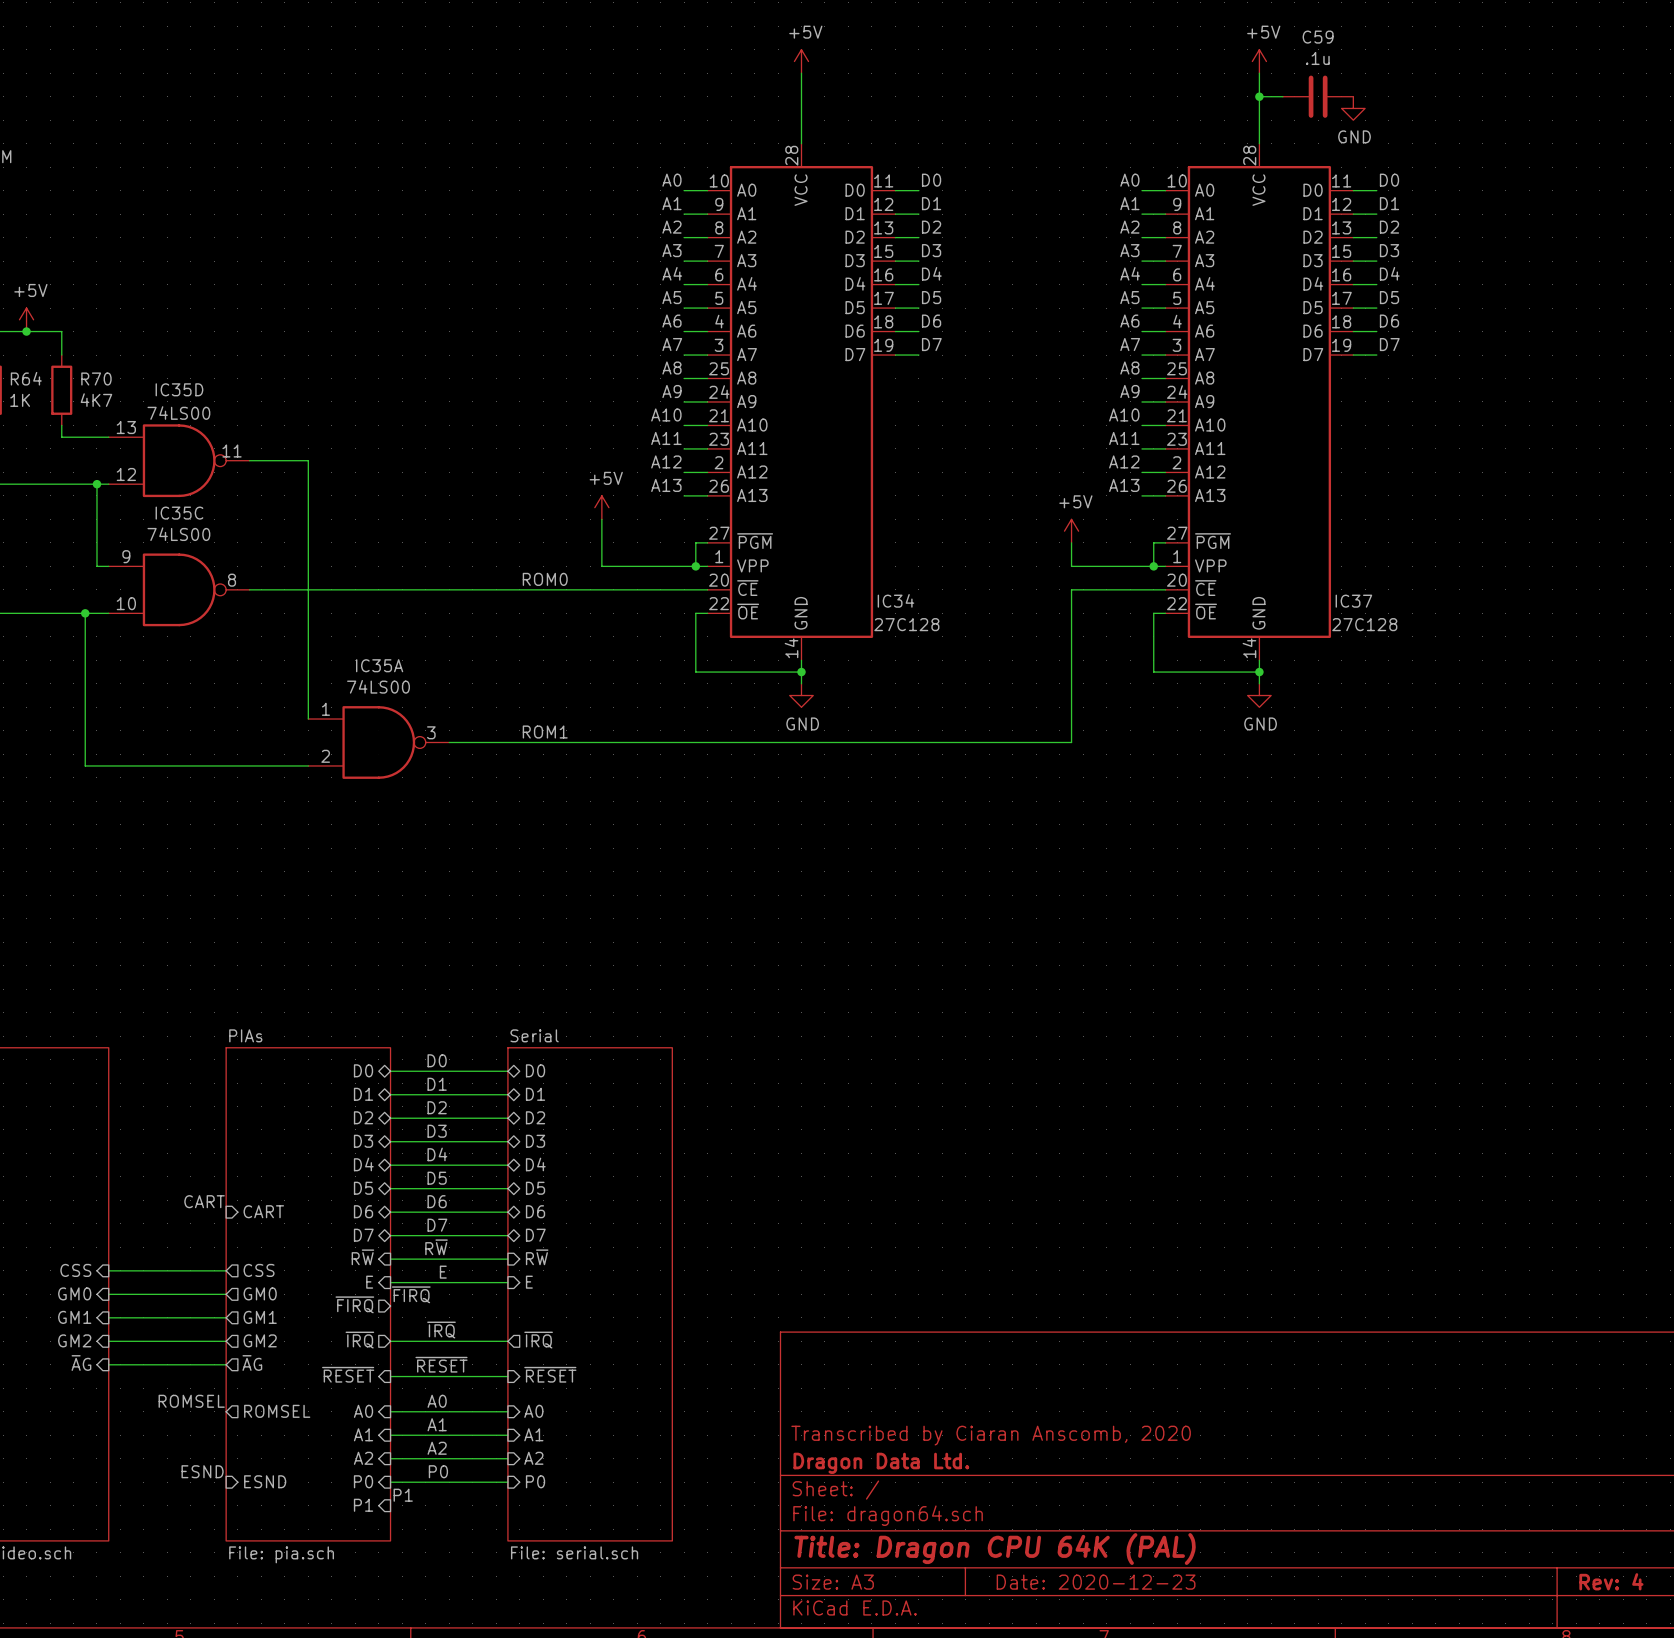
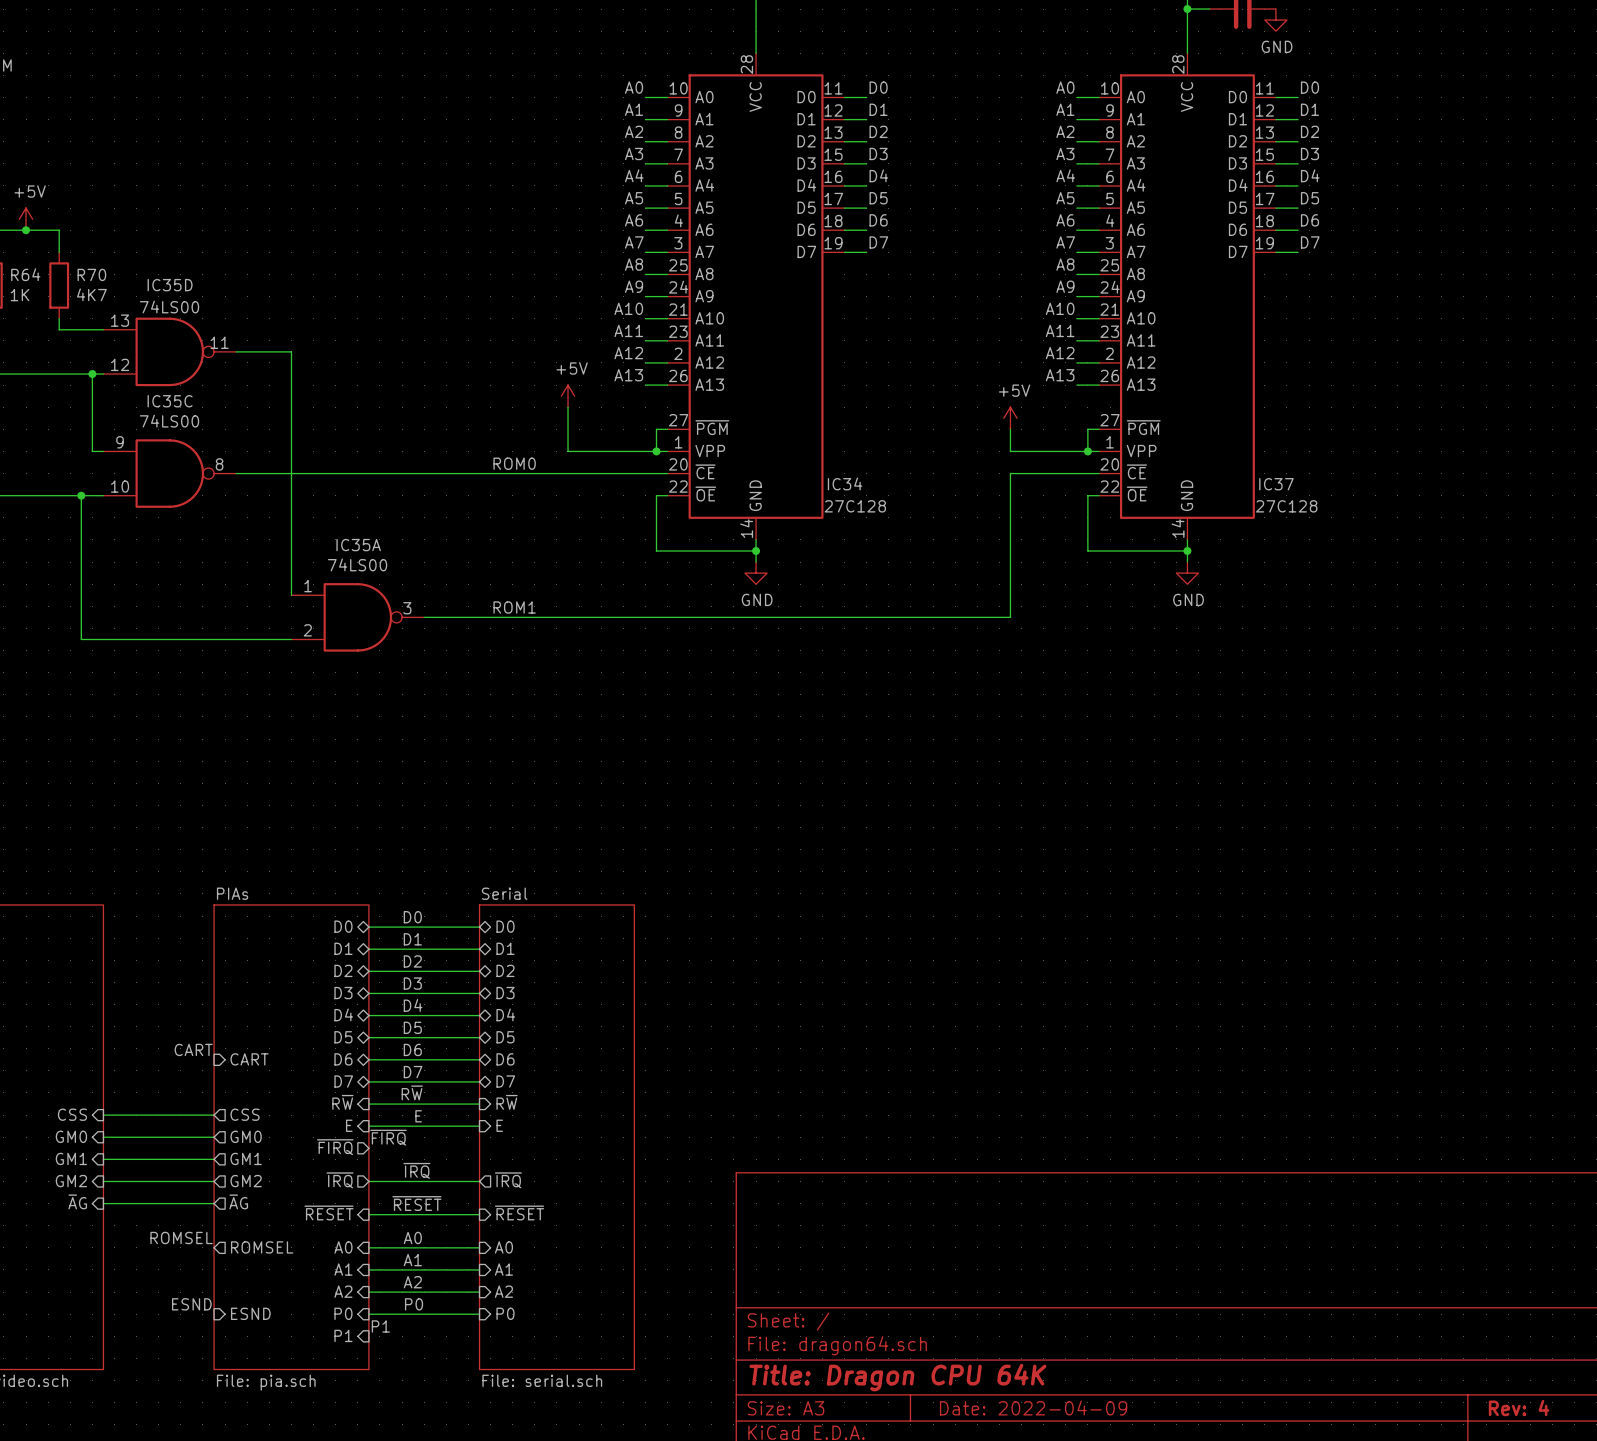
title block: Transcribed by Ciaran Anscomb, 2020 (991, 1435) -> none
title block: Dragon Data Ltd. (881, 1463) -> none
title block: Title: Dragon CPU 64K (PAL) (995, 1549) -> Title: Dragon CPU 64K (897, 1377)
title block: Date: 2020-12-23 (1096, 1582) -> Date: 2022-04-09 (1033, 1408)

